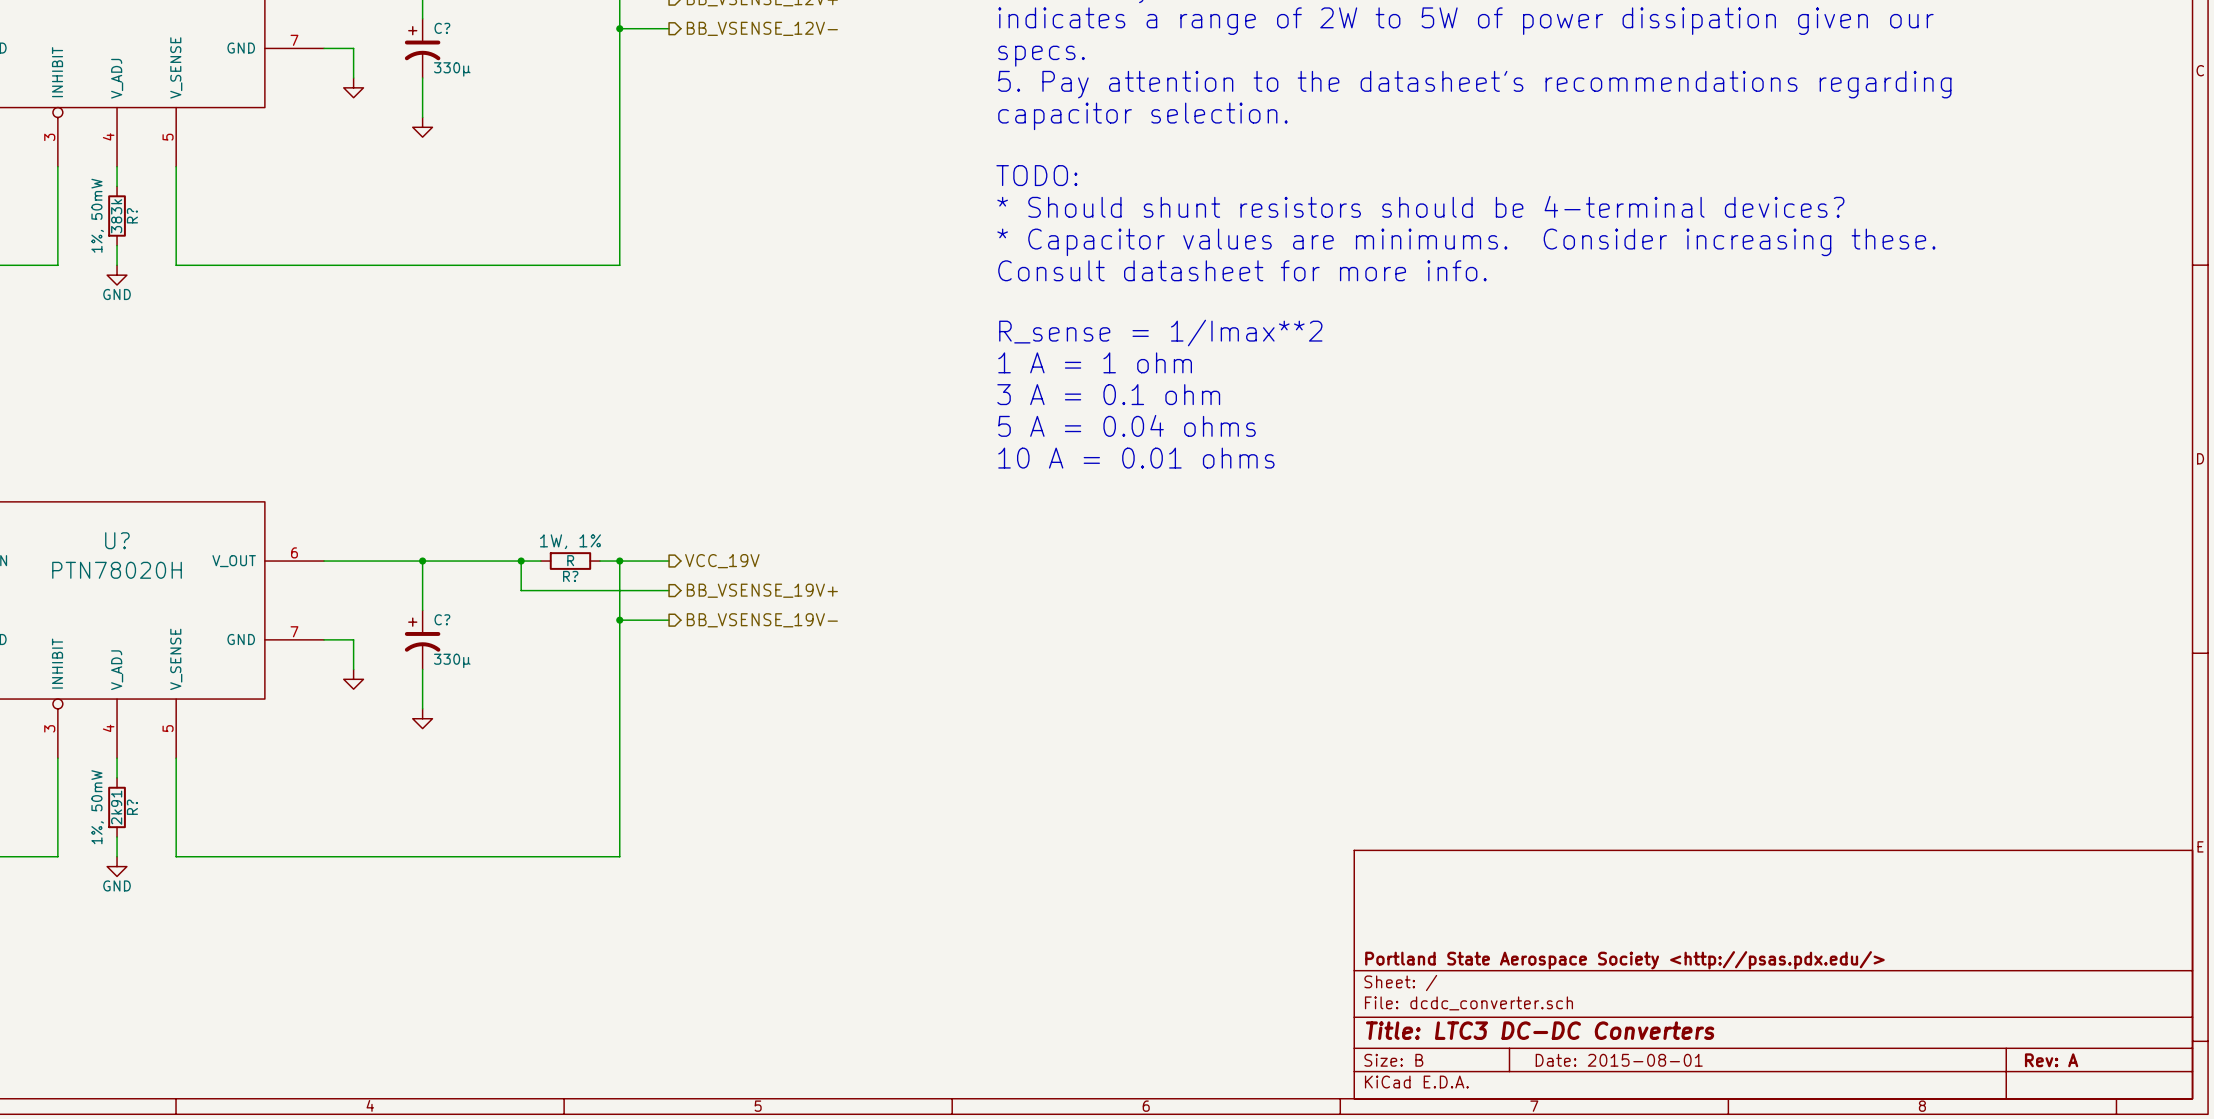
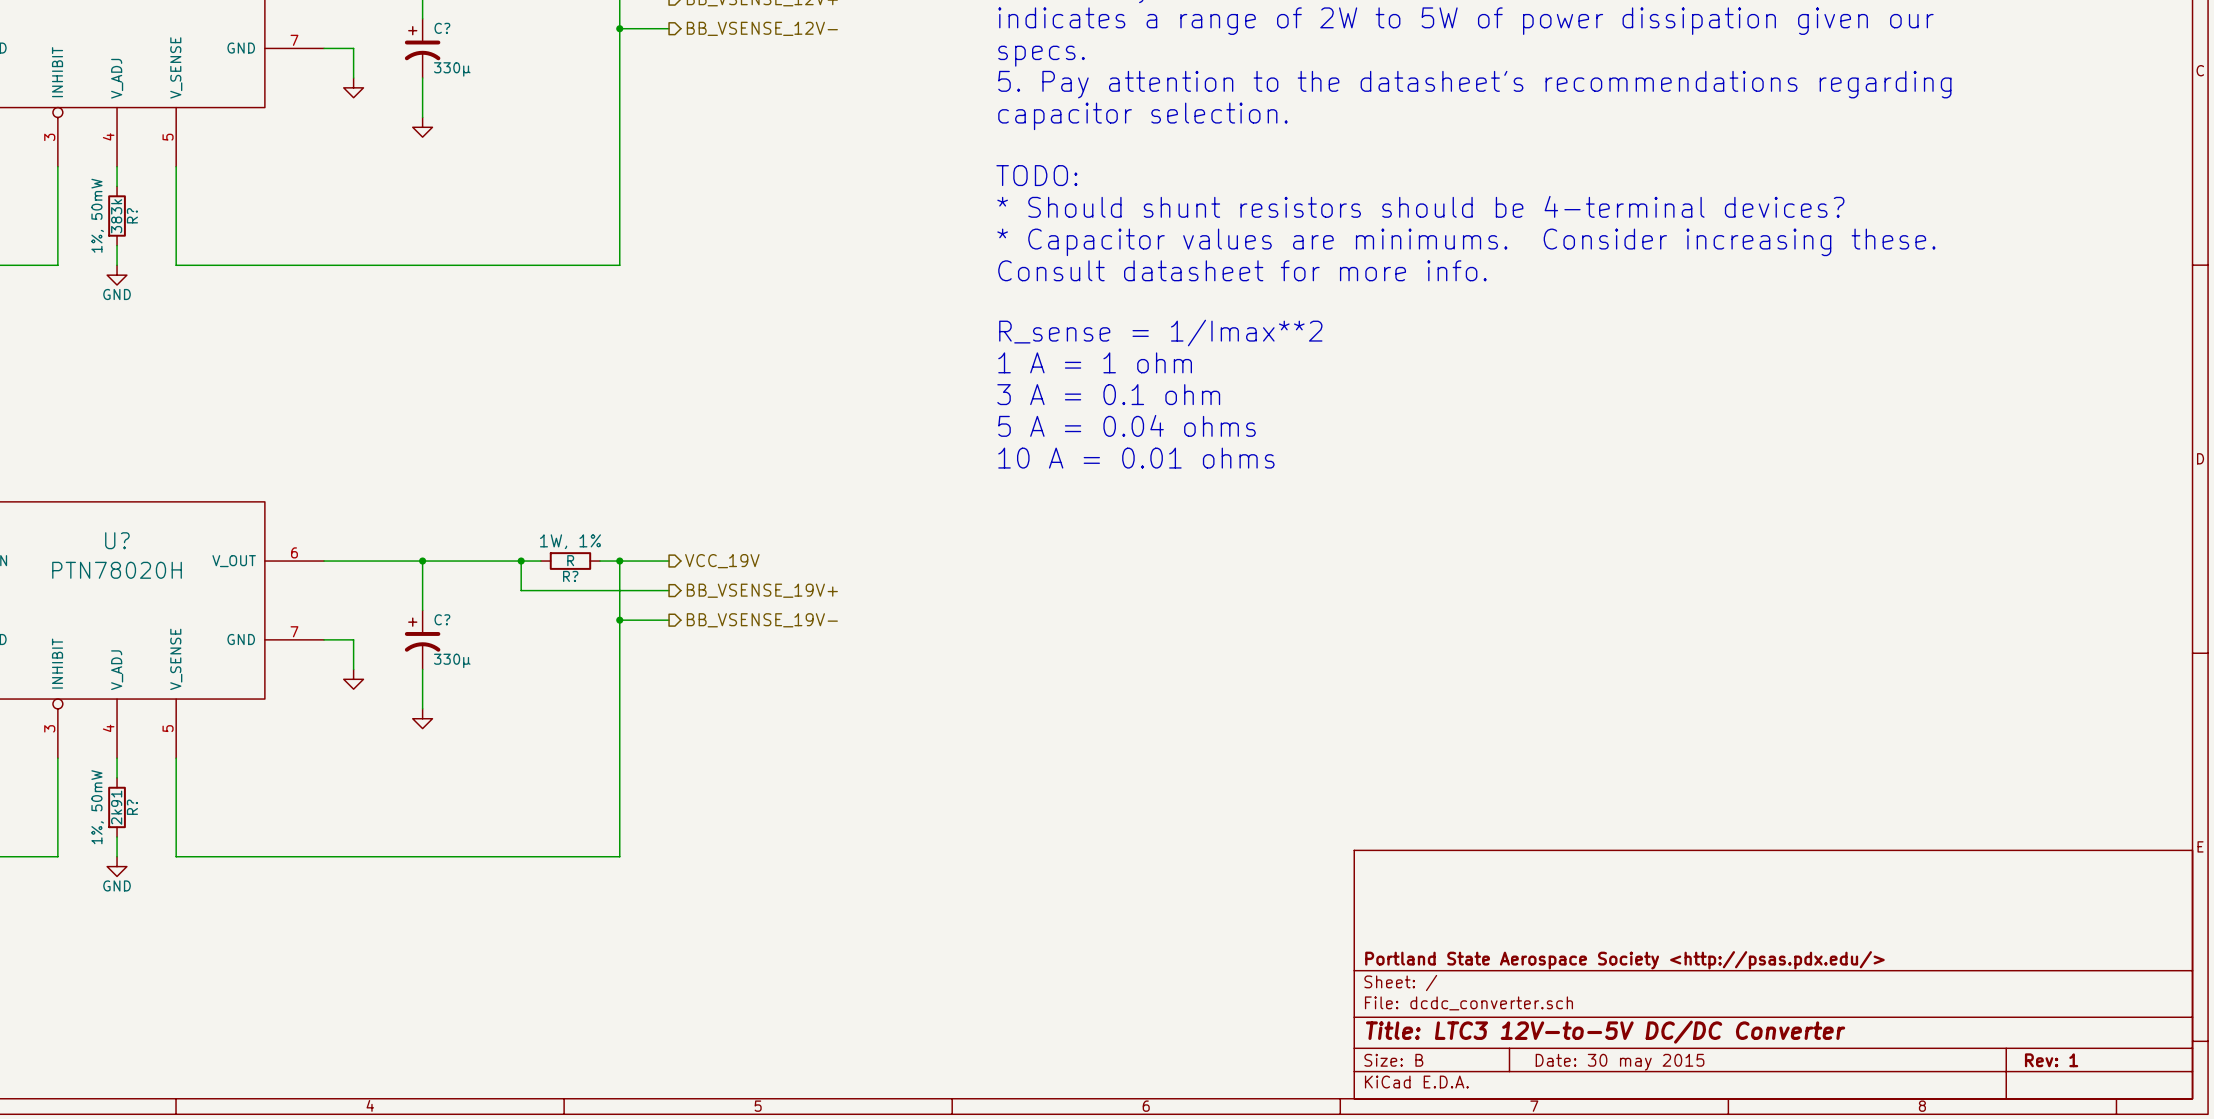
title block: Title: LTC3 DC-DC Converters (1540, 1030) -> Title: LTC3 12V-to-5V DC/DC Converter (1605, 1032)
title block: Date: 2015-08-01 (1619, 1060) -> Date: 30 may 2015 (1620, 1062)
title block: Rev: A (2051, 1060) -> Rev: 1 (2051, 1060)

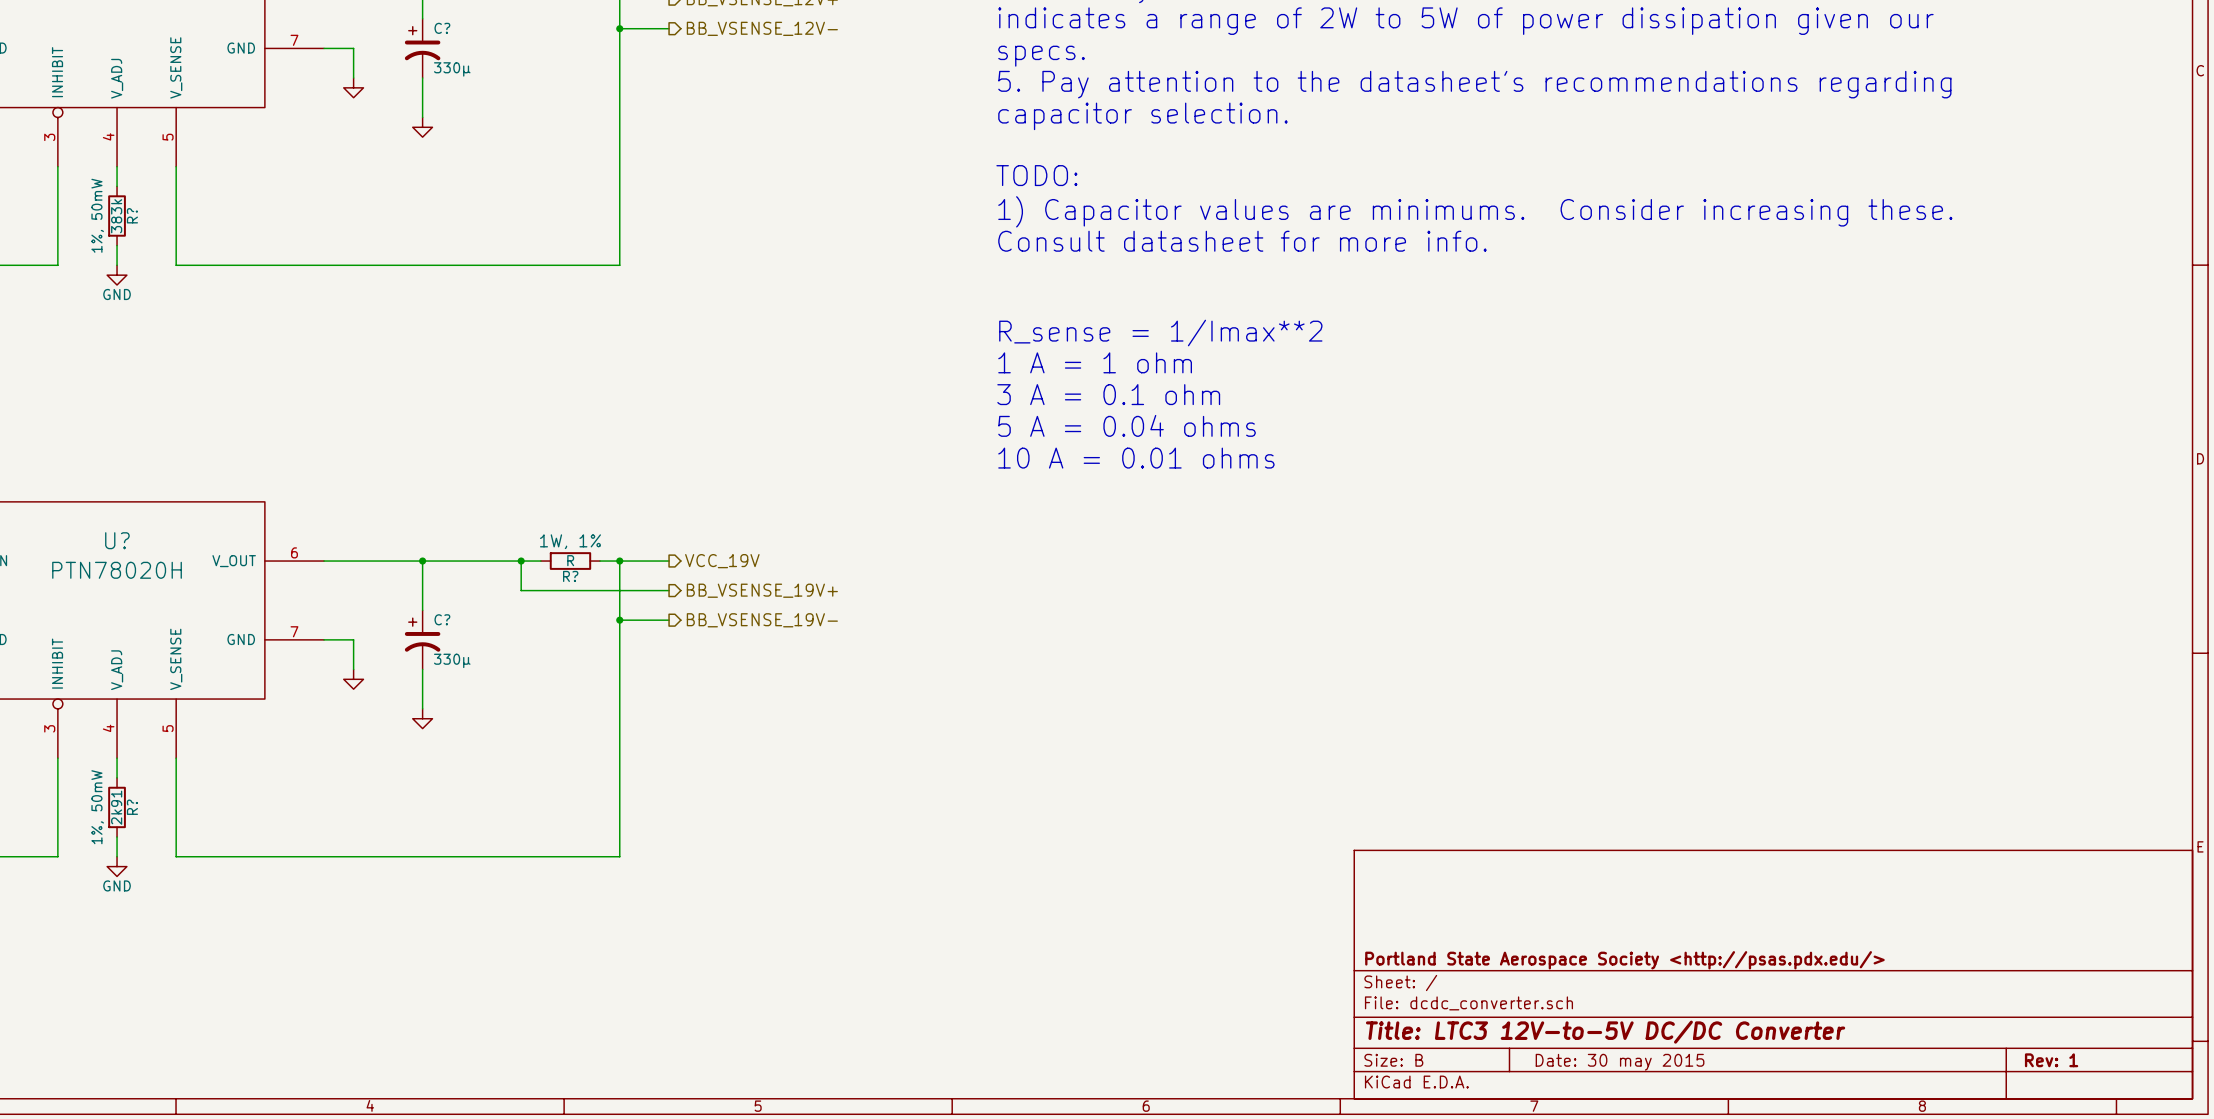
text: * Should shunt resistors should be 4-terminal devices? (1420, 206) -> 1) Capacitor values are minimums. Consider increasing these. (1475, 211)
text: * Capacitor values are minimums. Consider increasing these. (1466, 242) -> Consult datasheet for more info. (1242, 241)
text: Consult datasheet for more info. (1242, 270) -> none

